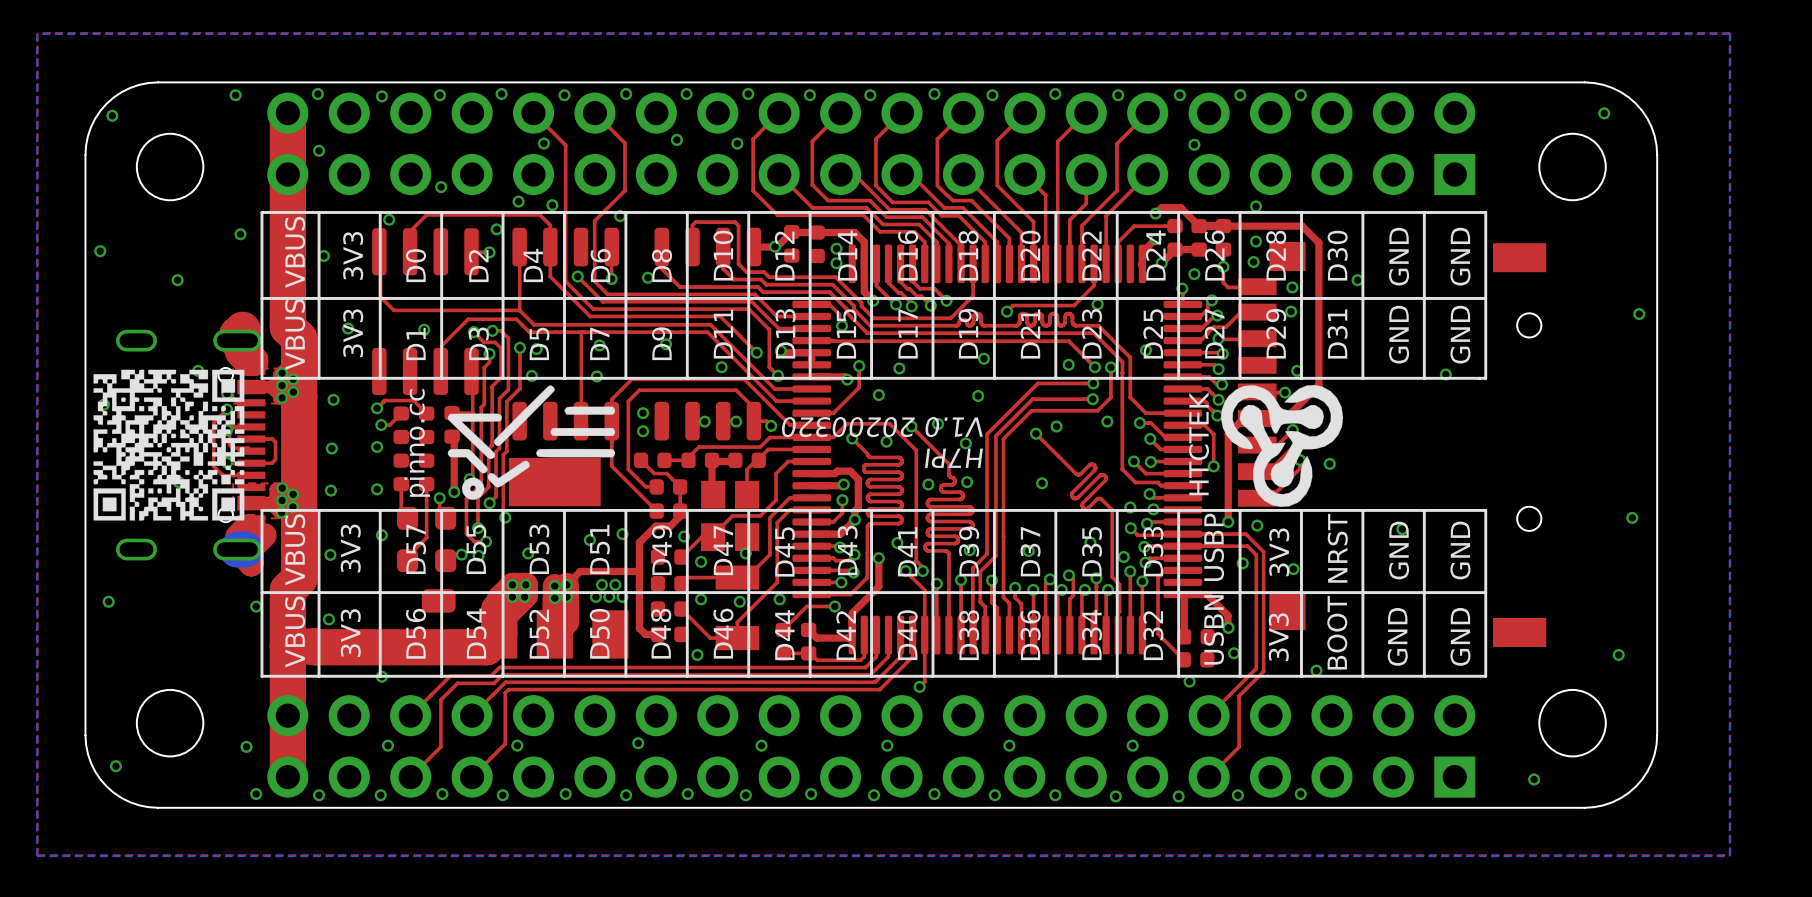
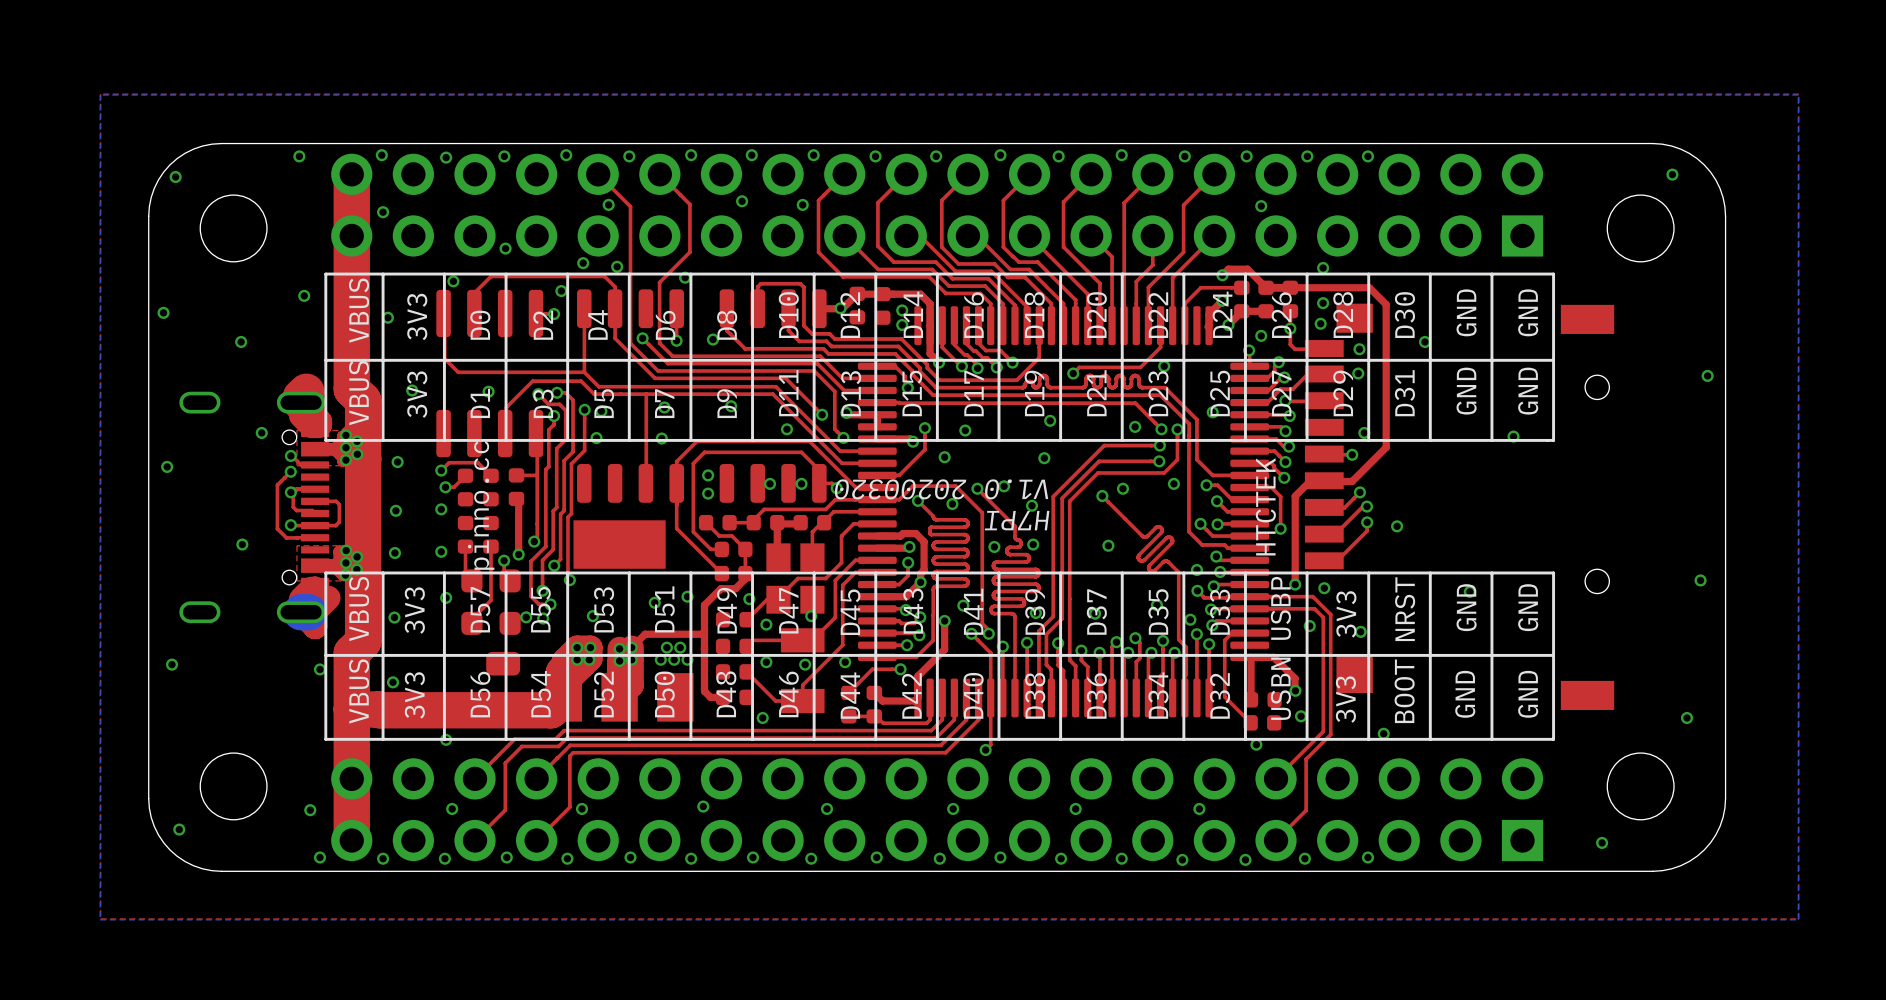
drawing: [93, 369, 245, 521] -> none
drawing: [447, 385, 616, 500] -> none
drawing: [1221, 385, 1344, 507] -> none

